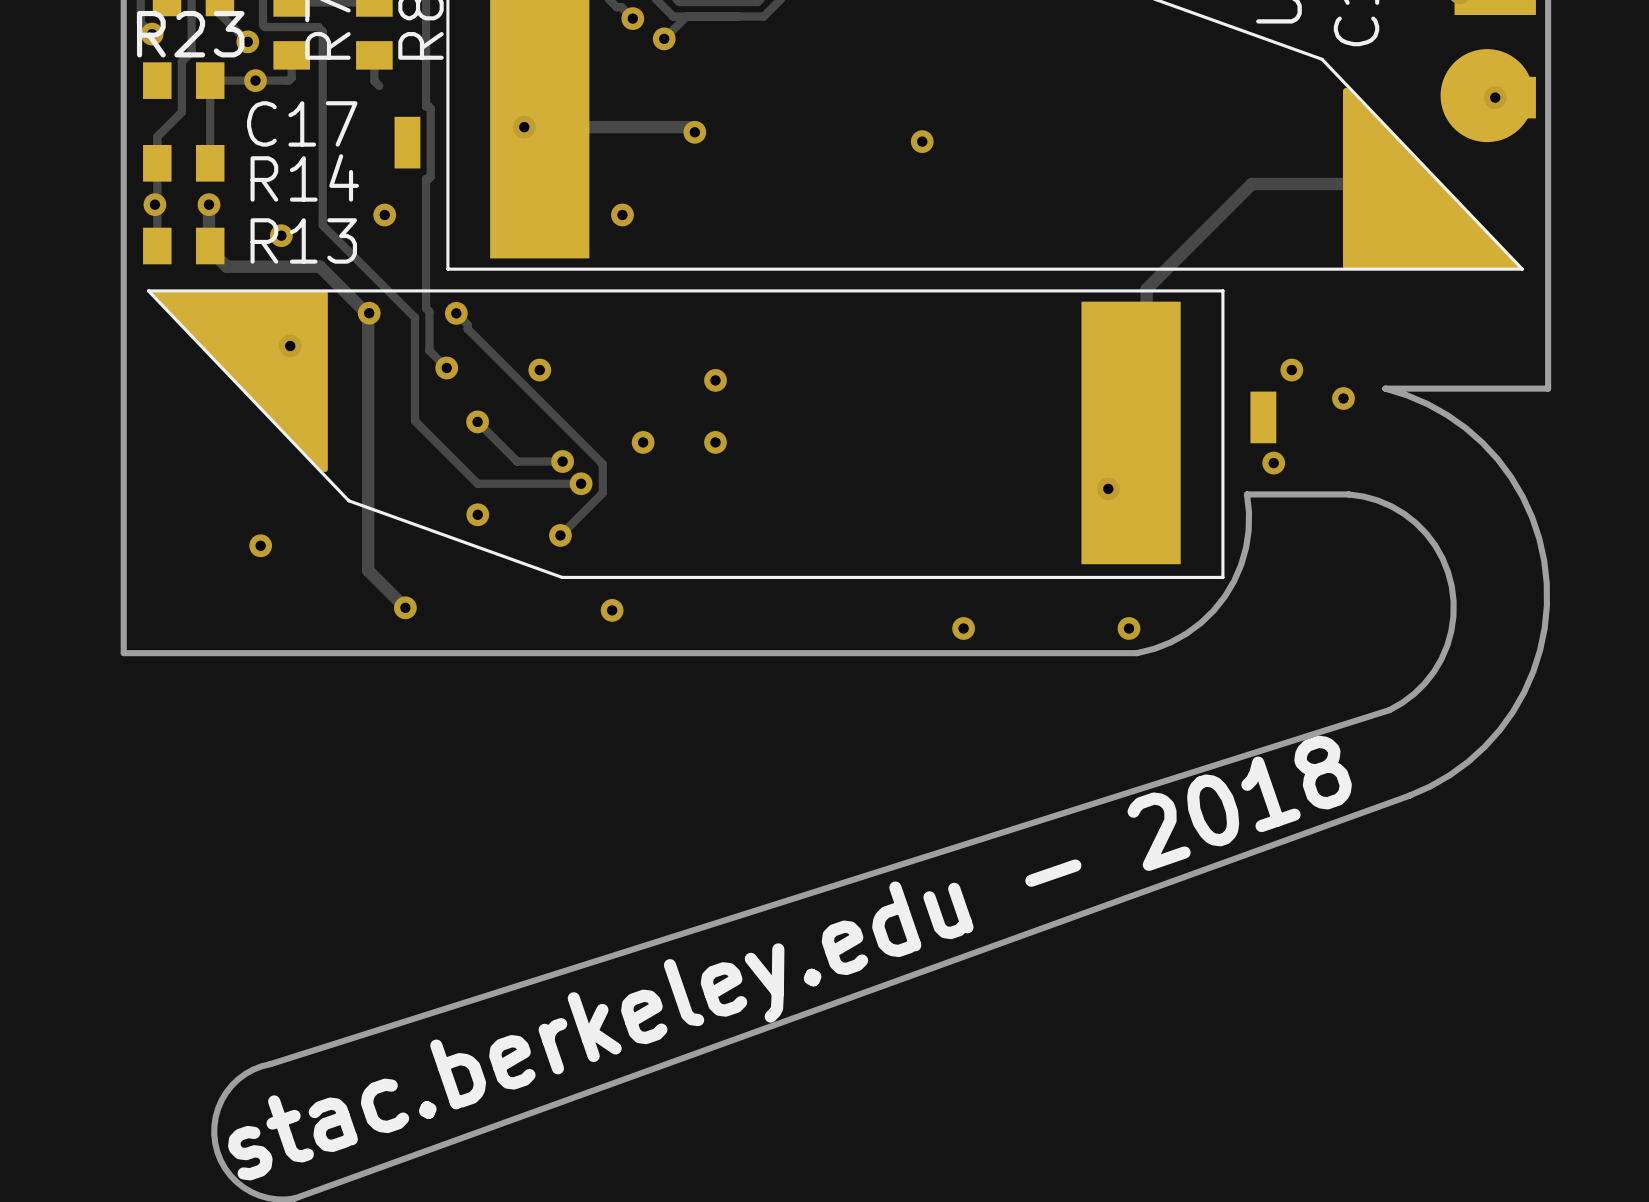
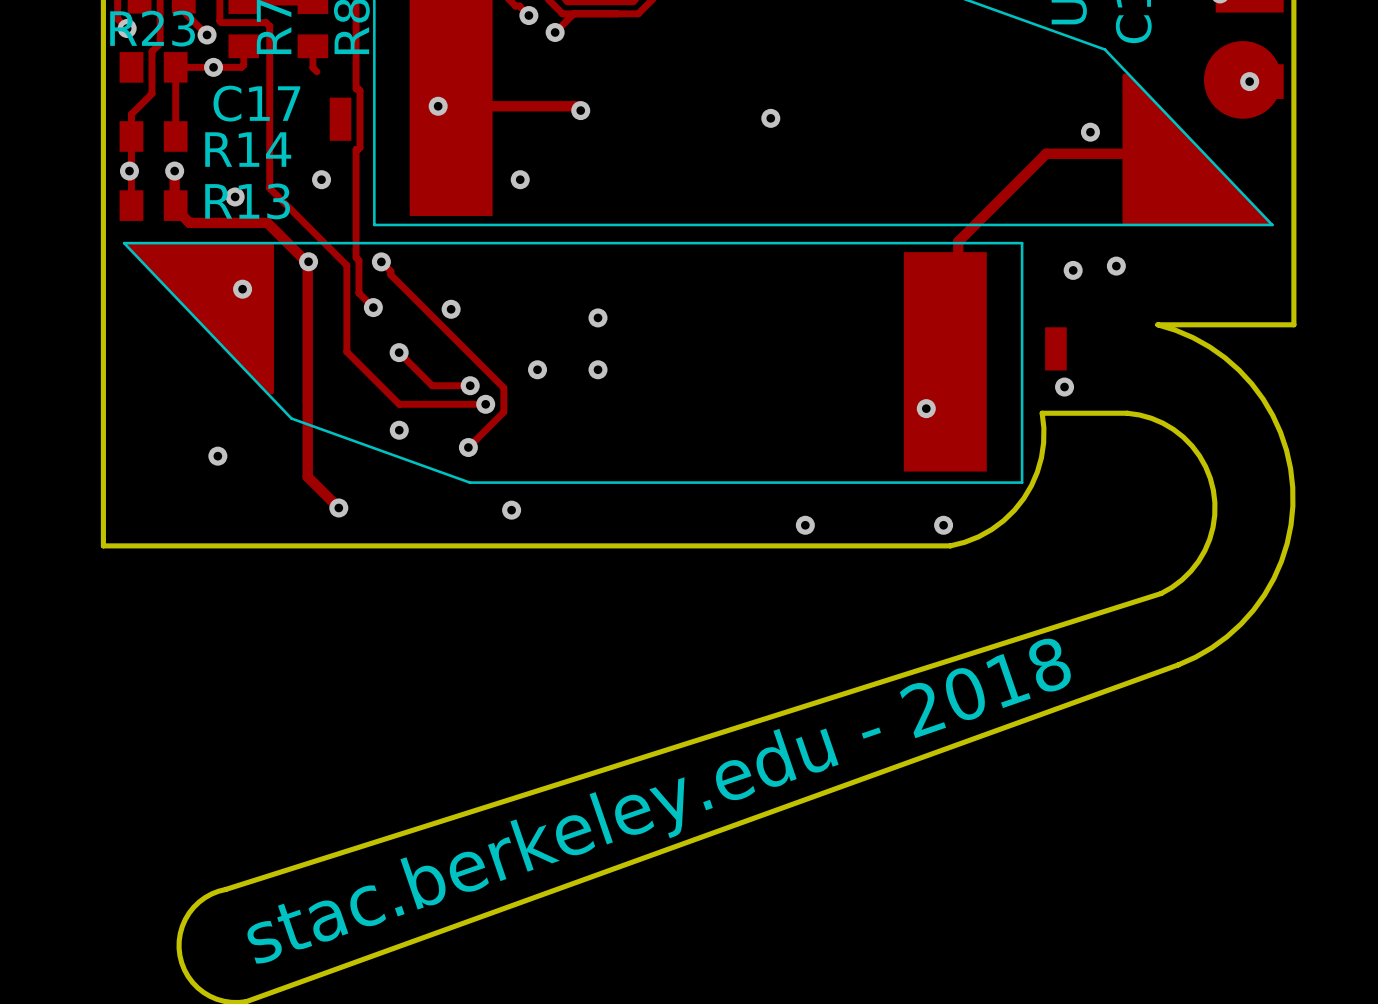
via: none -> (1090, 132)
via: none -> (1116, 266)
via: none -> (1073, 270)
via: (1291, 370) -> none
via: (1343, 398) -> none

